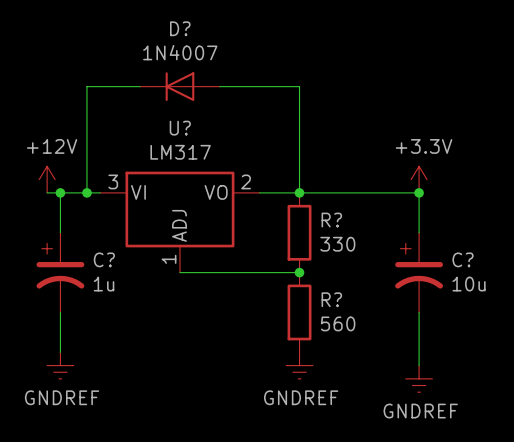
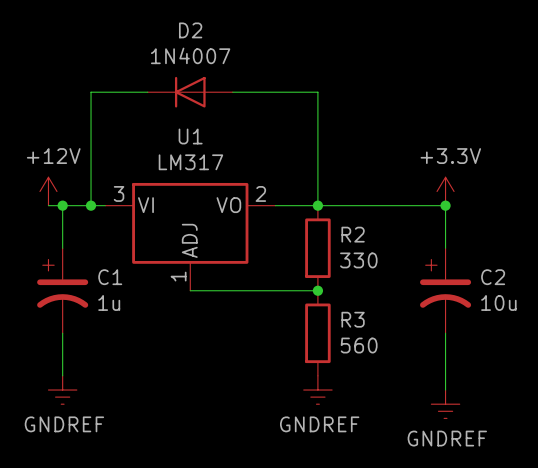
D? name: D? (180, 28) -> D2 (190, 30)
U? name: U? (180, 128) -> U1 (190, 136)
R? name: R? (331, 220) -> R2 (353, 234)
C? name: C? (104, 259) -> C1 (110, 277)
C? name: C? (463, 259) -> C2 (493, 277)
R? name: R? (331, 299) -> R3 (353, 319)

